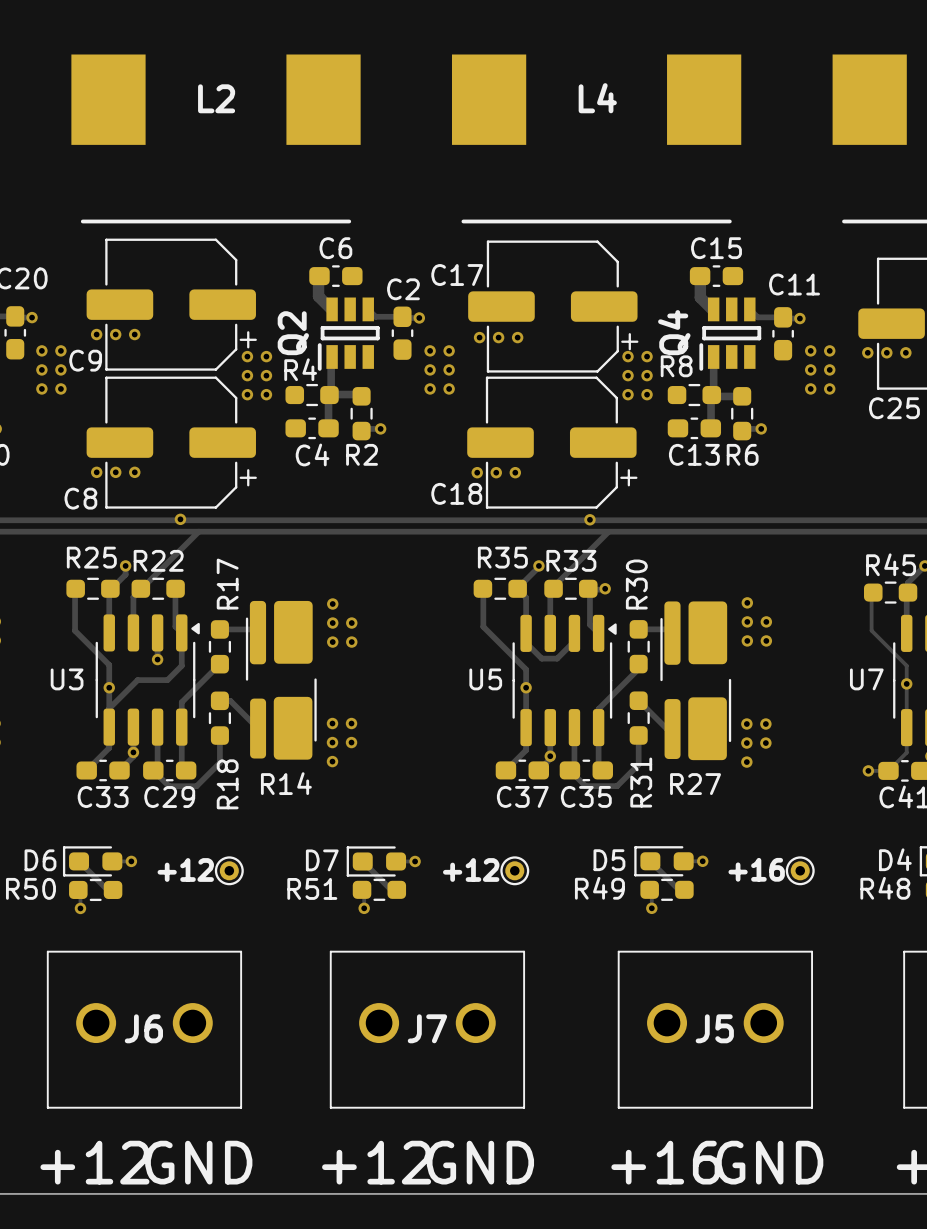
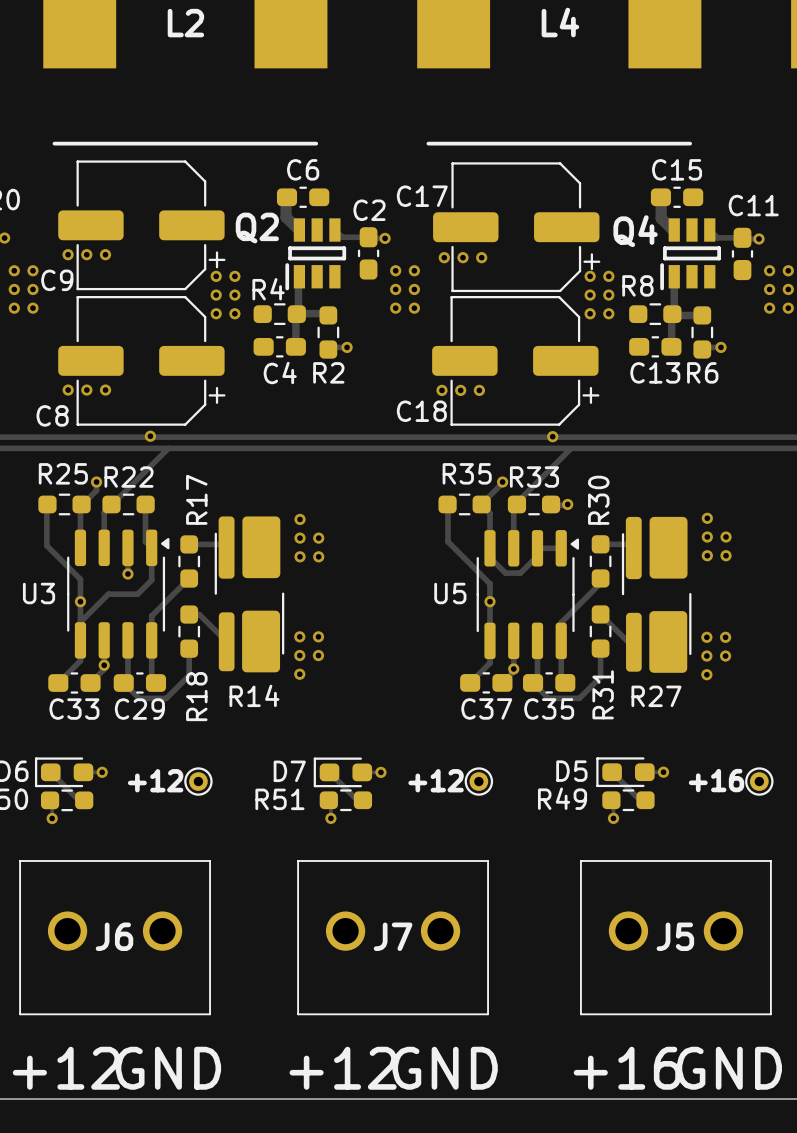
Q4 name rotation: 0° (674, 332) -> 90° clockwise (635, 231)
Q2 name rotation: 0° (293, 333) -> 90° clockwise (257, 228)
track: (590, 587) (589, 624) (598, 633) -> (537, 548) (561, 548)

